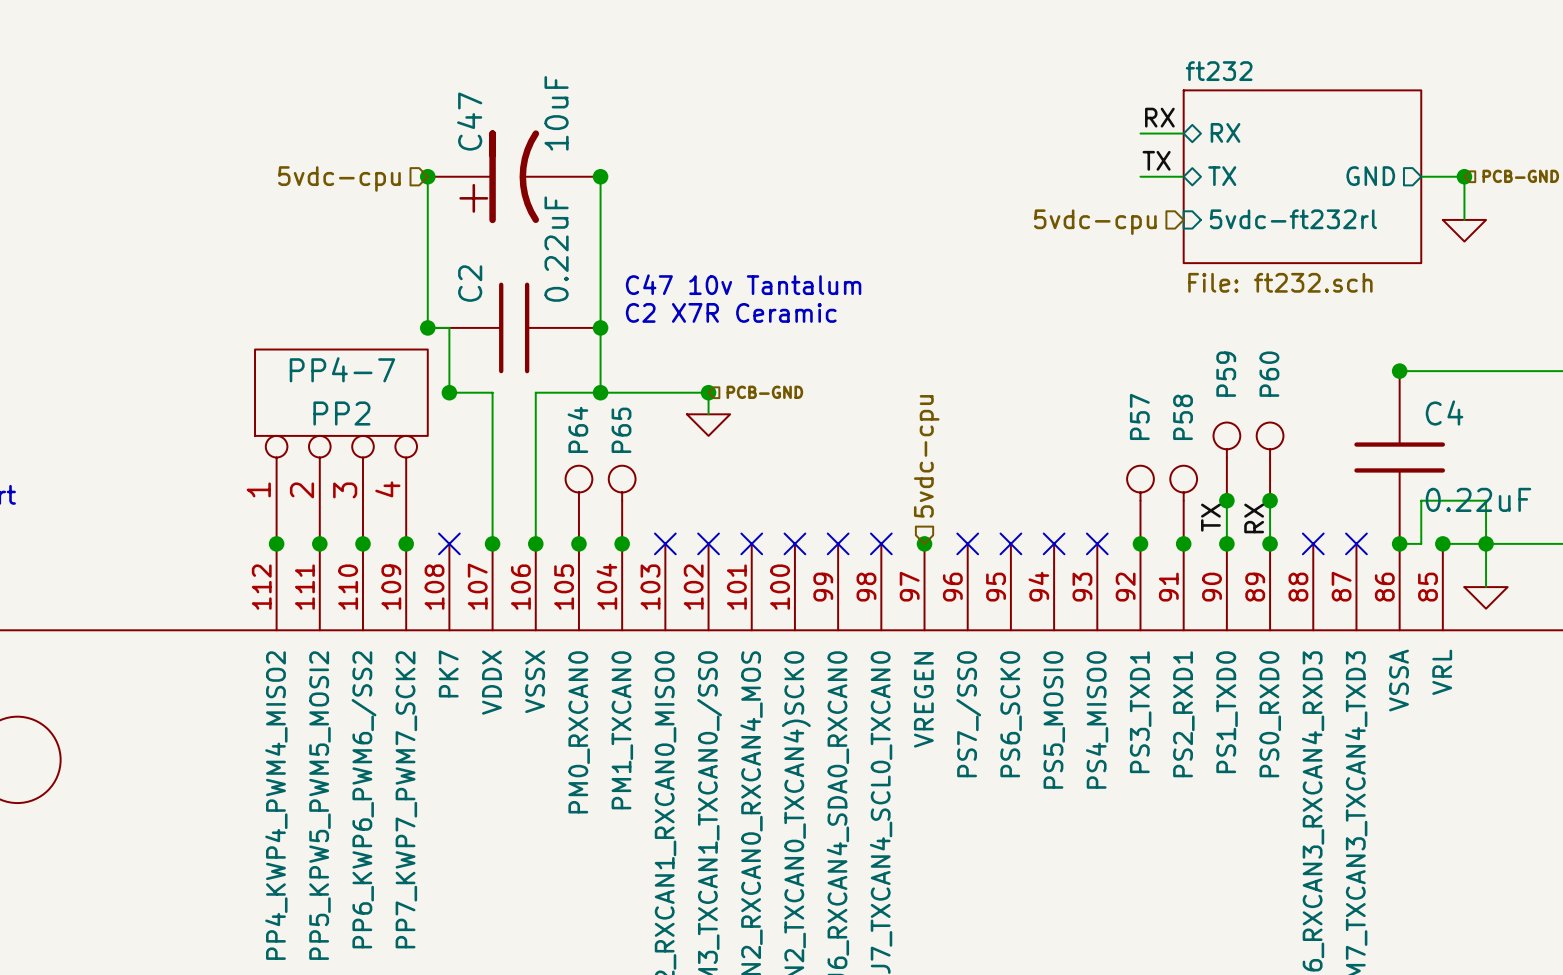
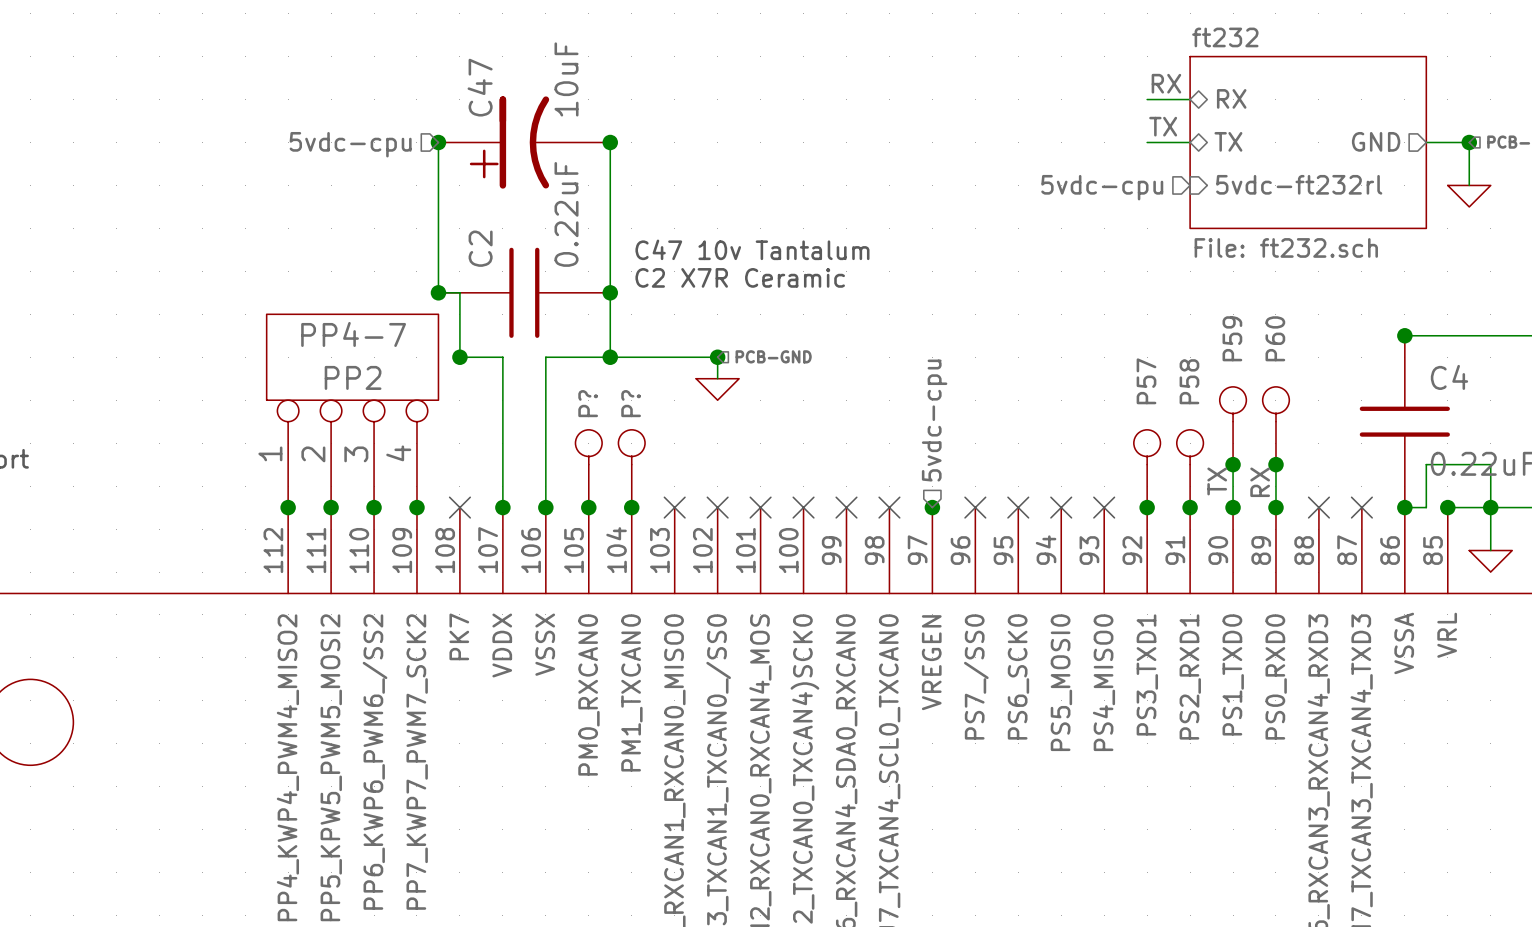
P64 name: P64 (577, 429) -> P? (588, 403)
P65 name: P65 (621, 430) -> P? (631, 403)

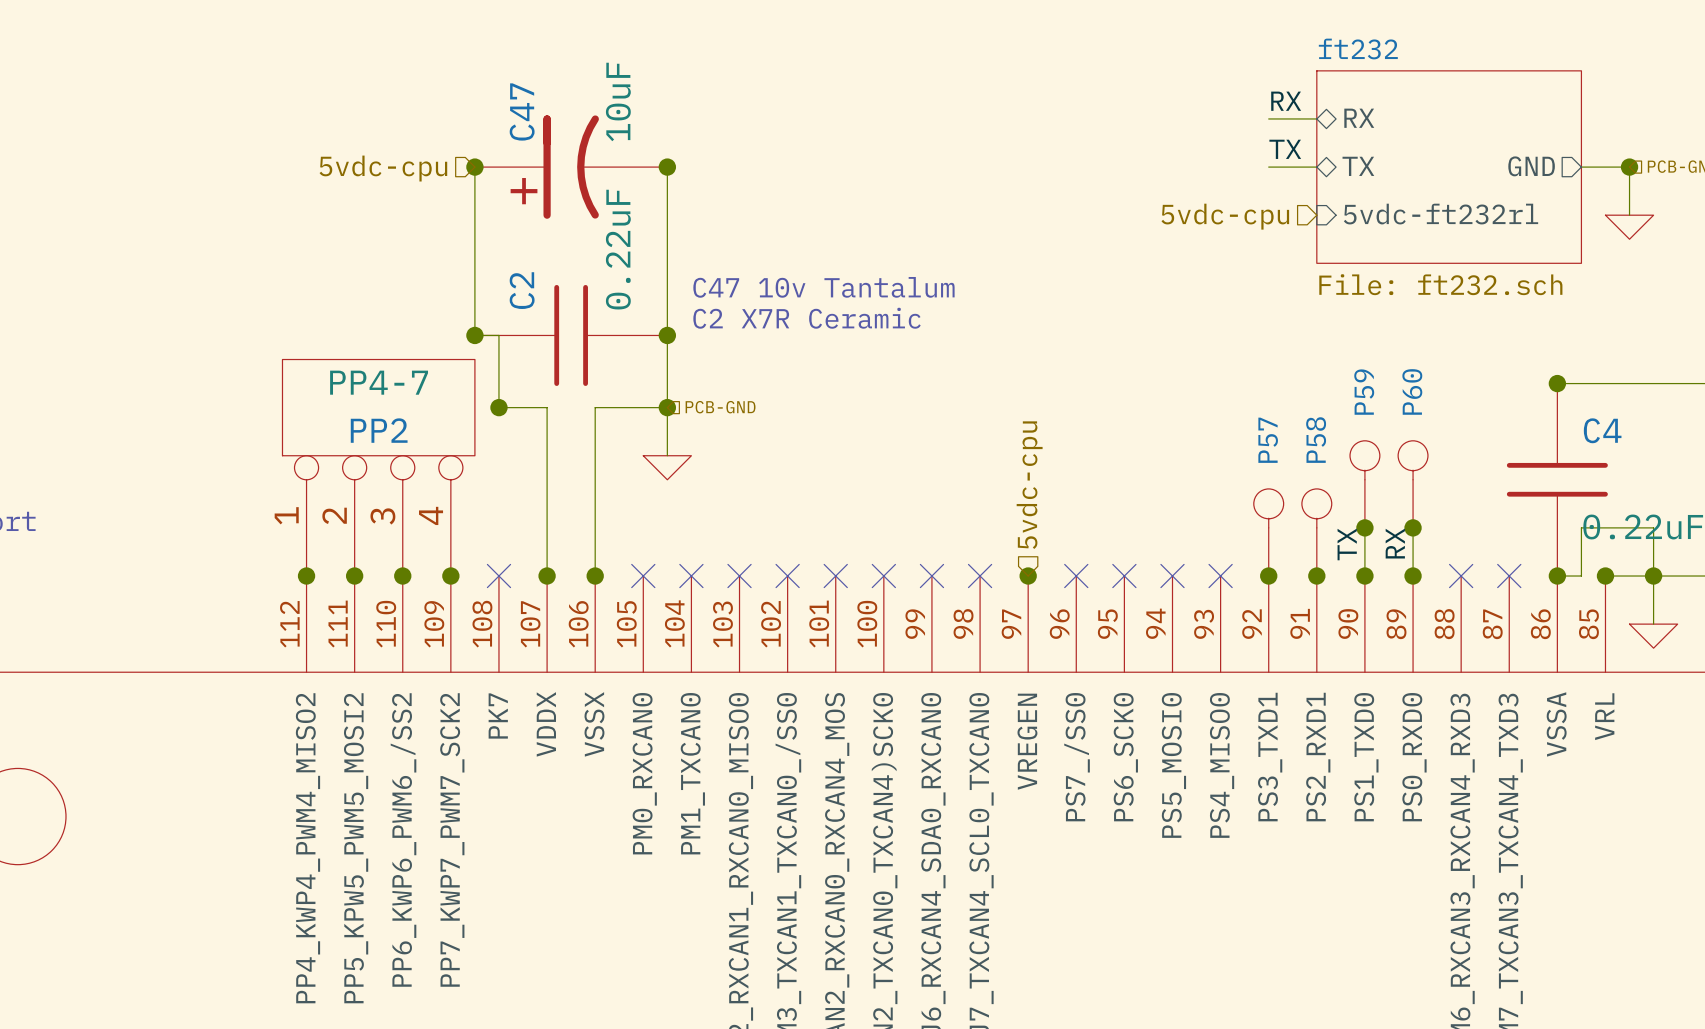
hierarchical label position: PCB-GND (773, 356) -> PCB-GND (720, 407)
wire: (610, 357) (717, 357) (717, 378) -> (667, 407) (667, 455)
junction: (717, 357) -> none
power symbol position: (717, 389) -> (667, 467)
P?: (588, 468) -> none
P?: (631, 468) -> none
junction: (588, 507) -> none
no-connect mark: none -> (643, 576)
junction: (631, 507) -> none
no-connect mark: none -> (691, 576)

